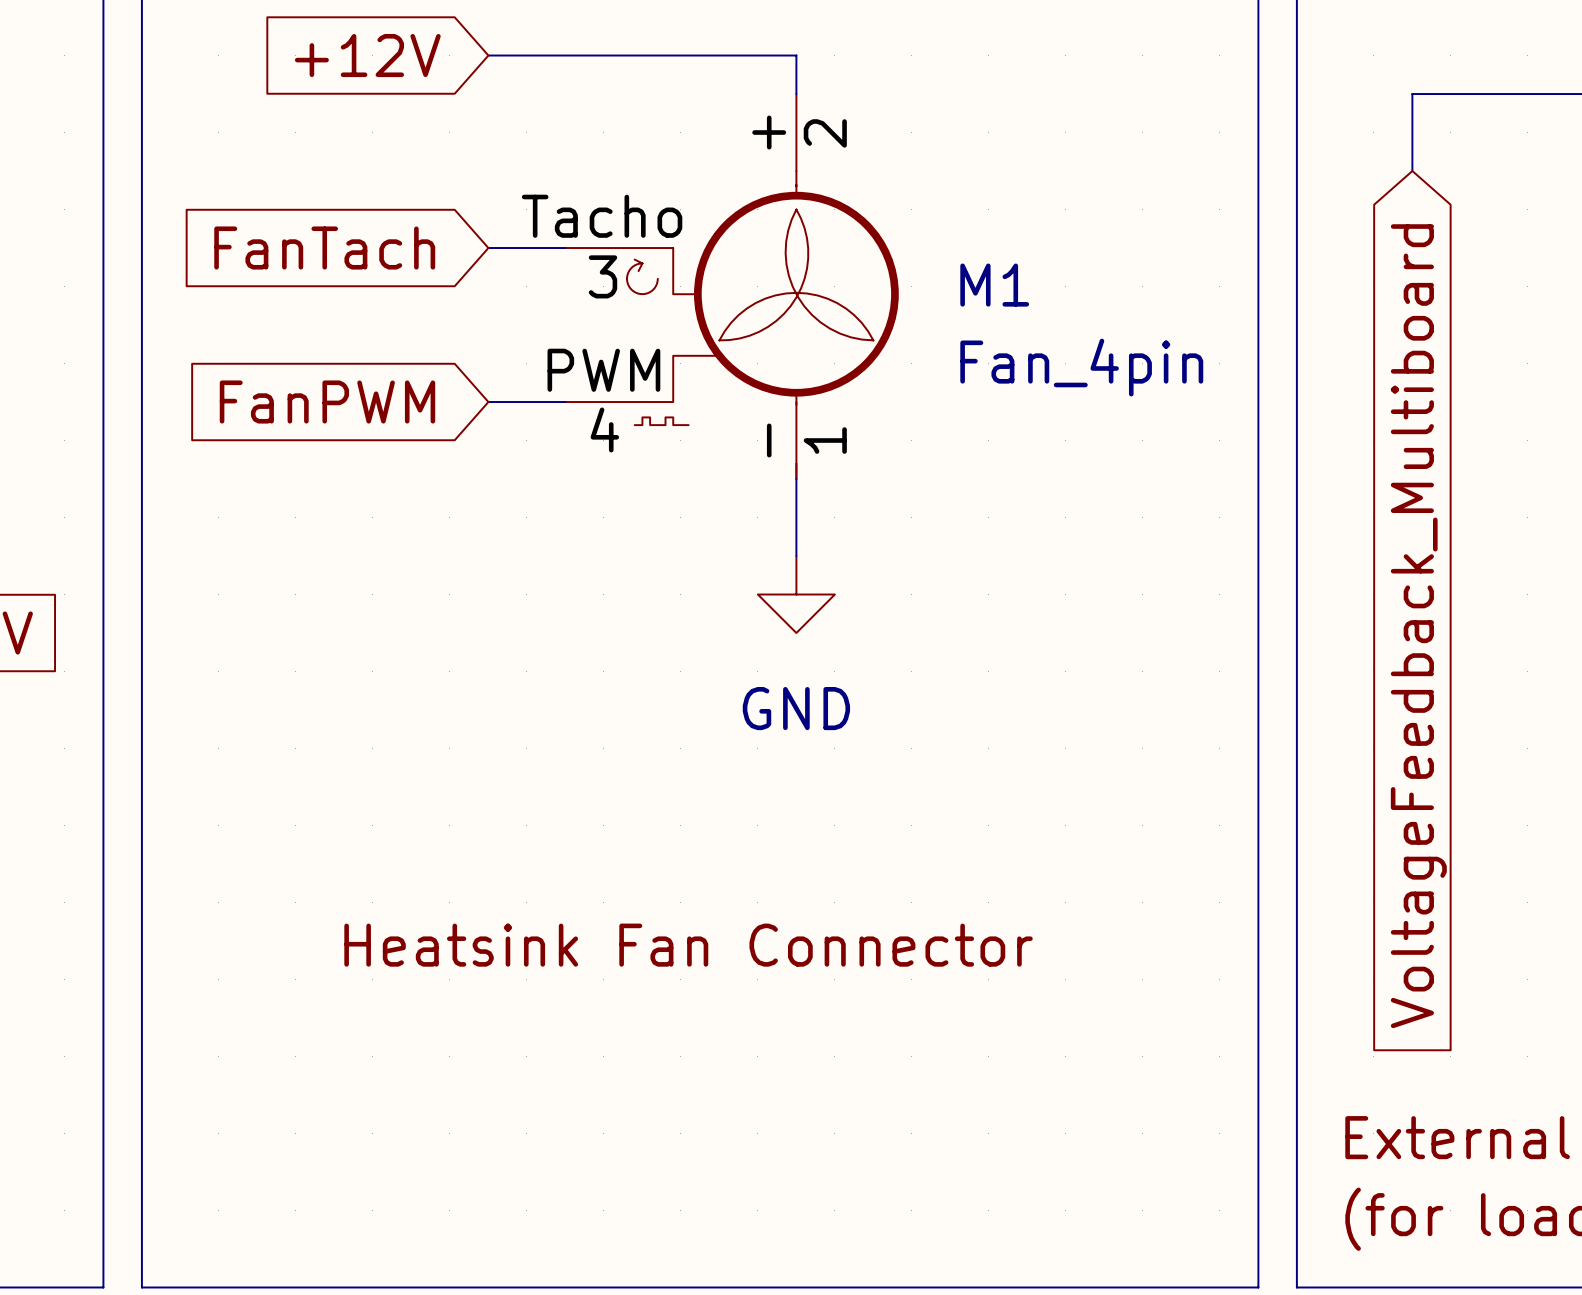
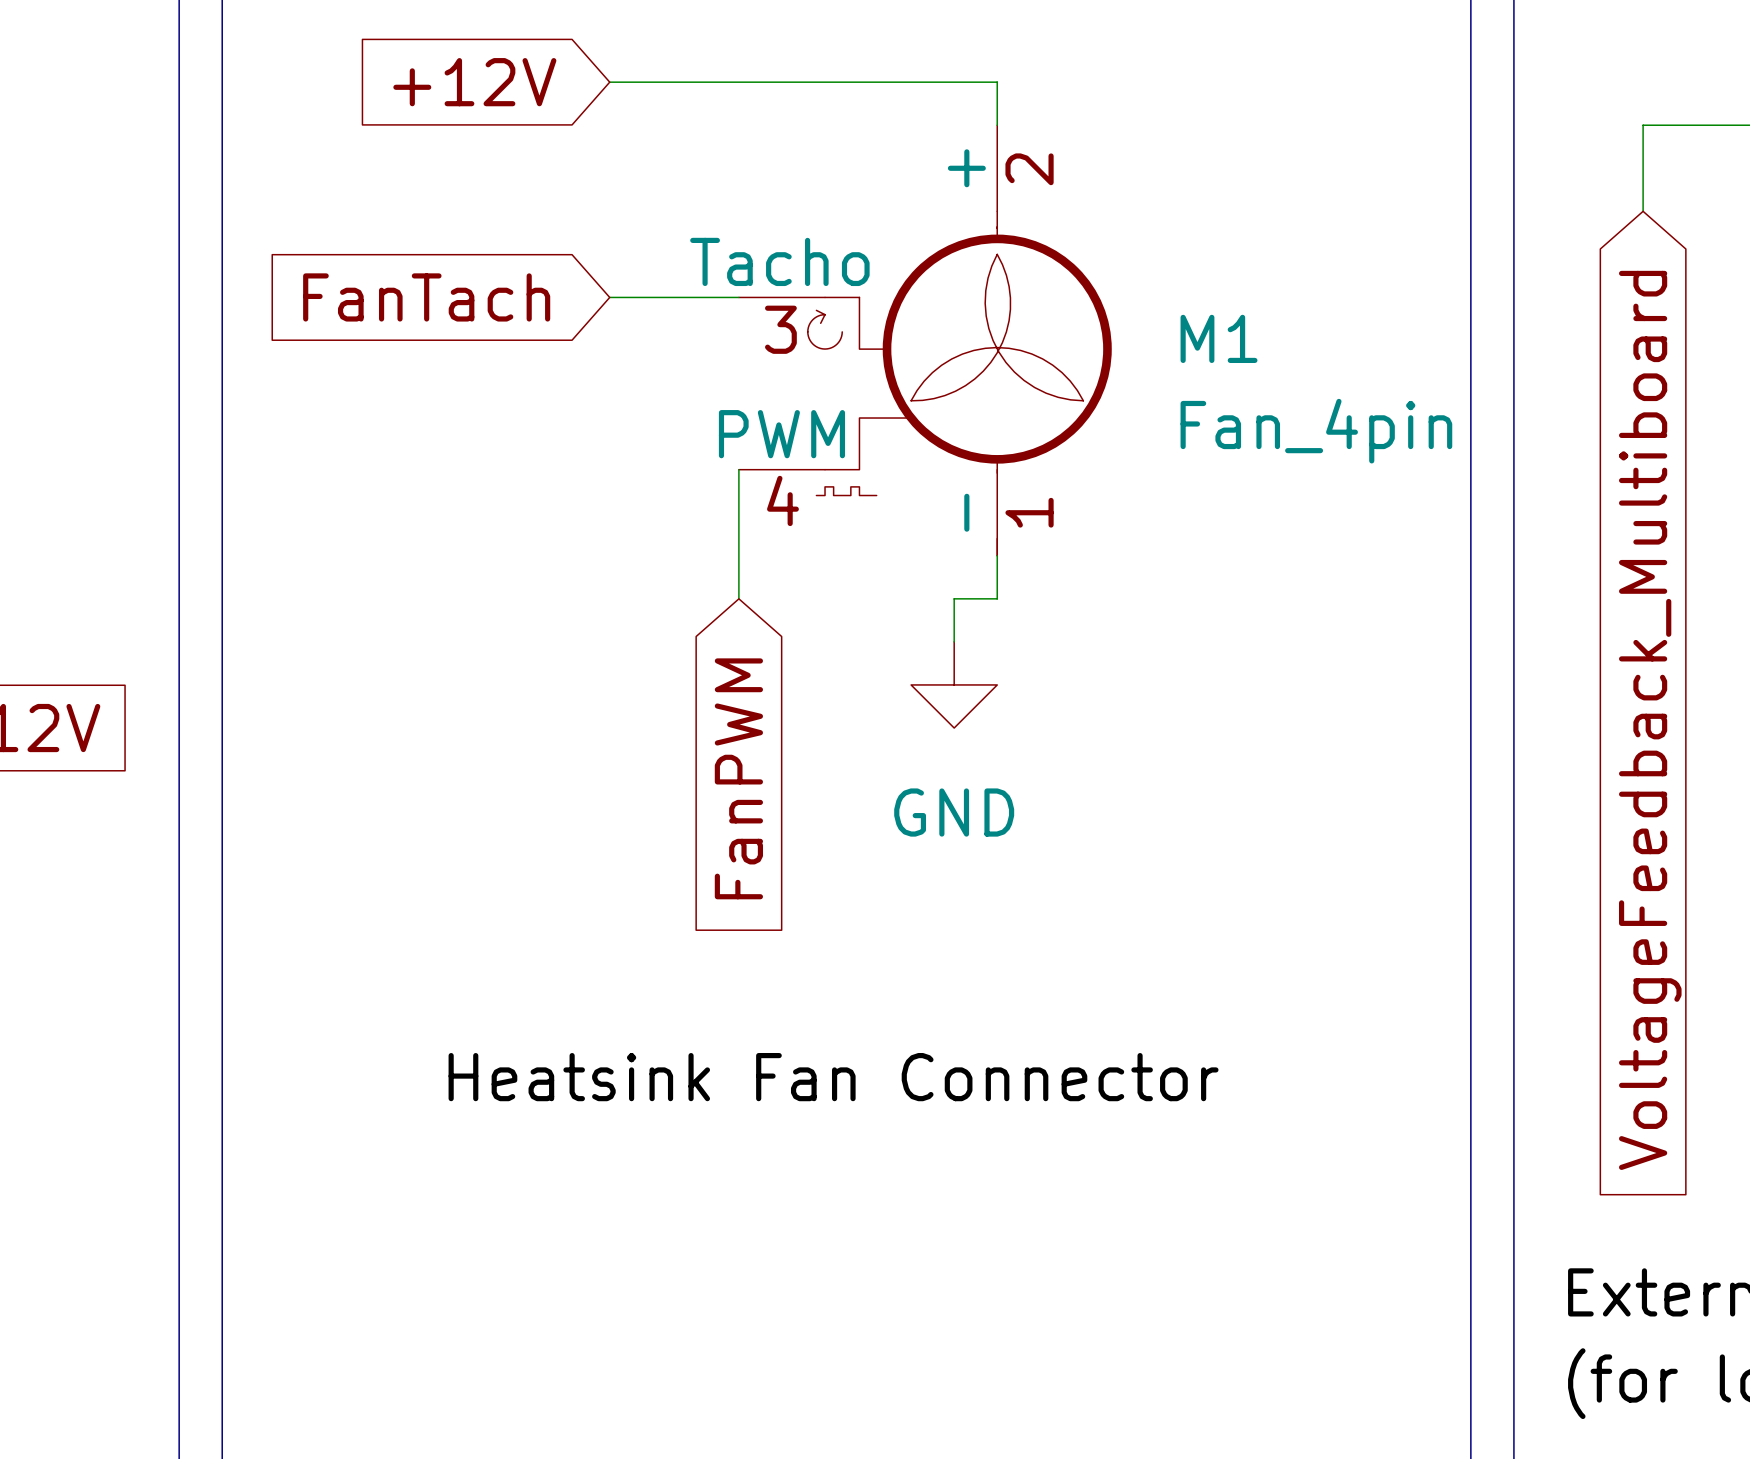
wire: (796, 55) (796, 94) -> (954, 82) (997, 82) (997, 125)
M1 position: (732, 286) -> (925, 340)
global label rotation: 0° (327, 402) -> 90° counterclockwise (738, 778)
global label position: FanPWM (327, 402) -> FanPWM (738, 778)
wire: (488, 402) (565, 402) -> none
wire: none -> (738, 469) (738, 598)
wire: (796, 479) (796, 517) -> (997, 555) (997, 598) (954, 598)

